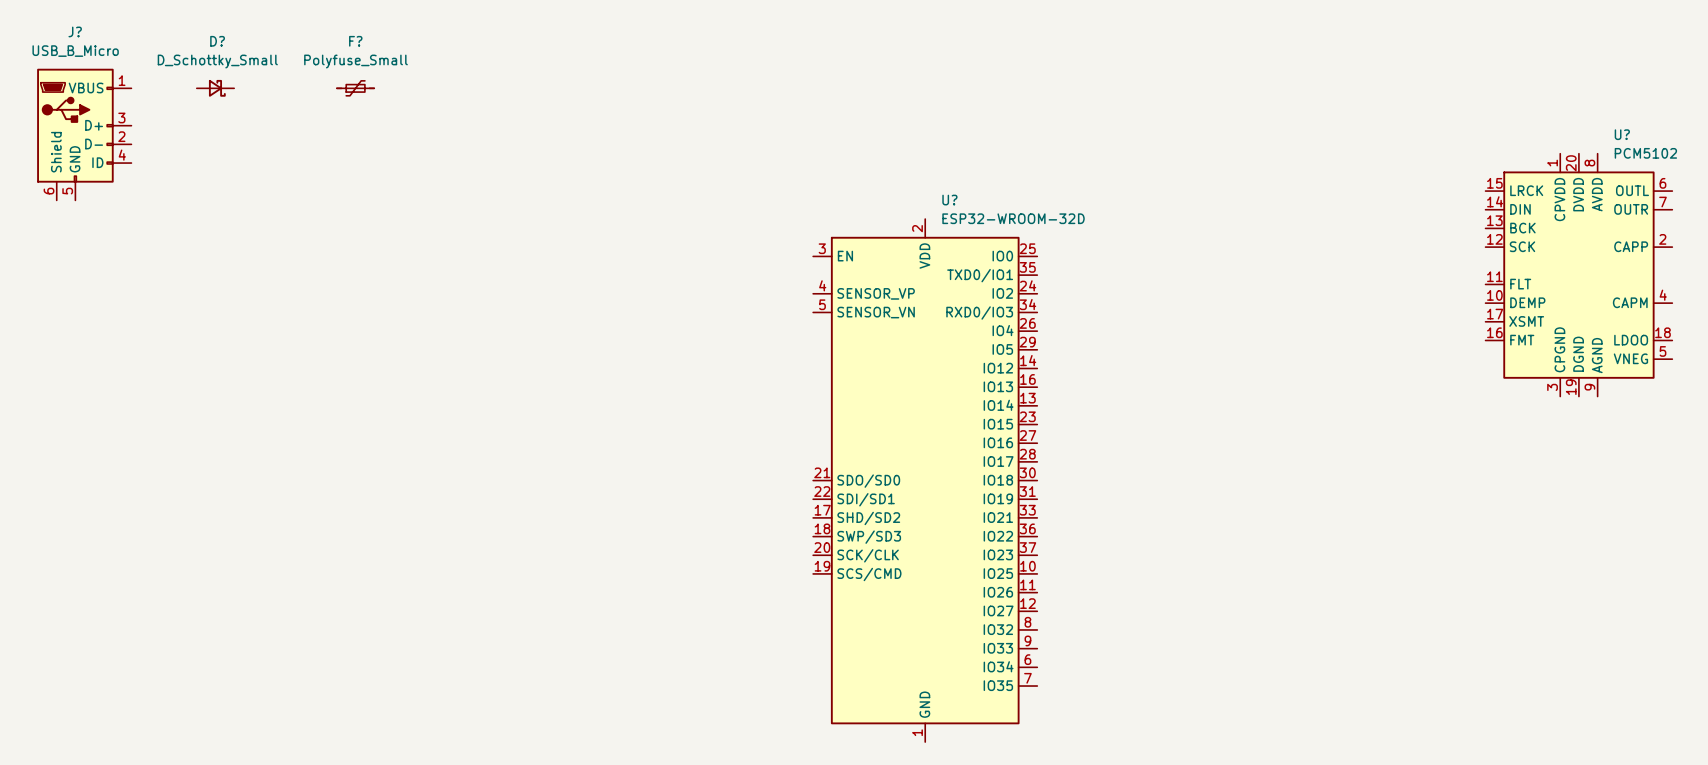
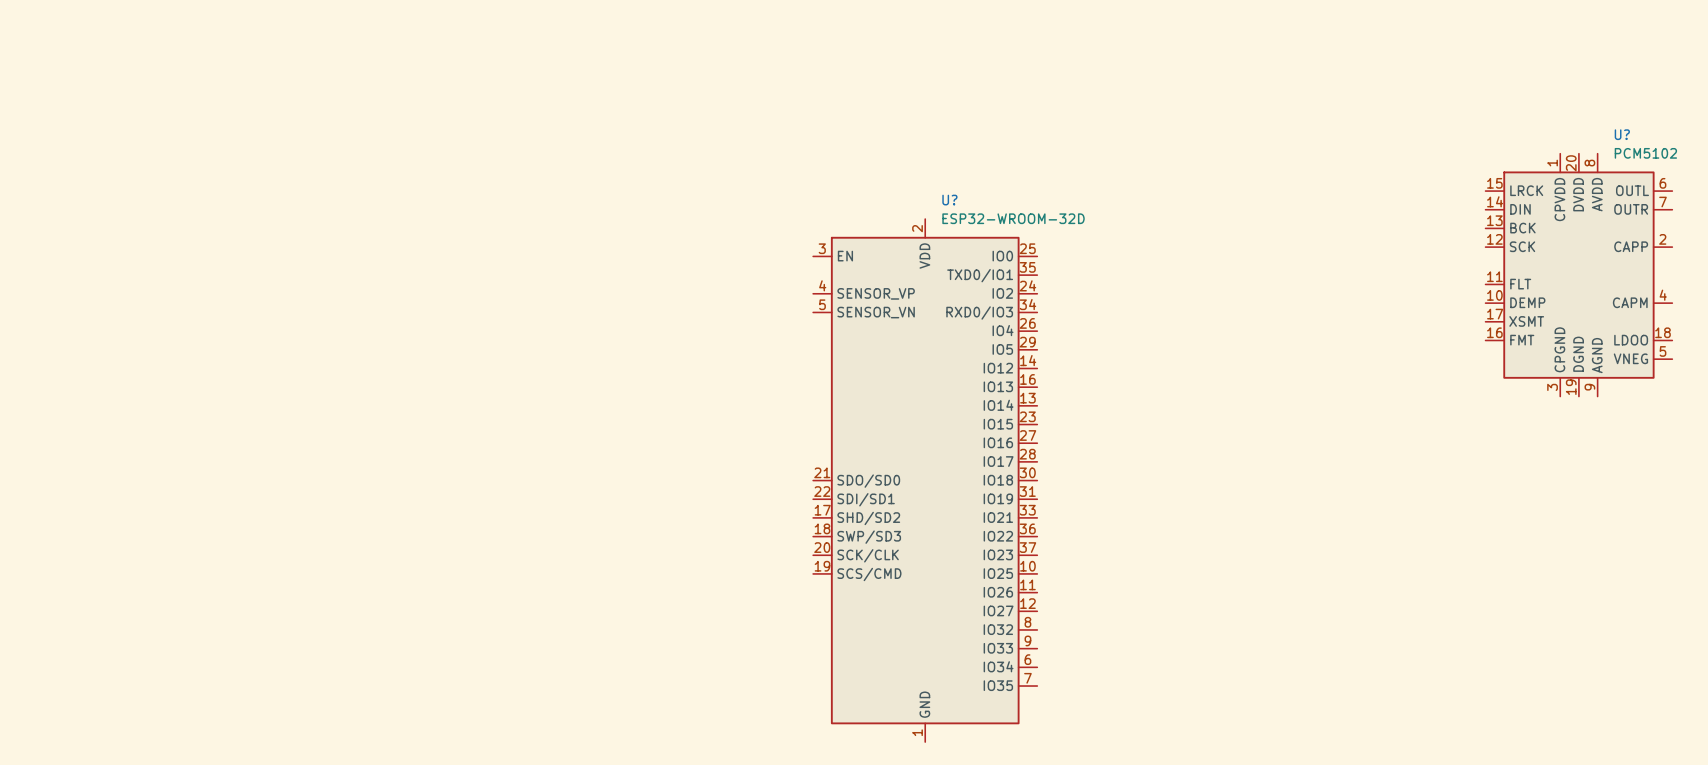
D?: D_Schottky_Small (215, 88) -> none
F?: Polyfuse_Small (355, 88) -> none
J?: USB_B_Micro (84, 134) -> none

